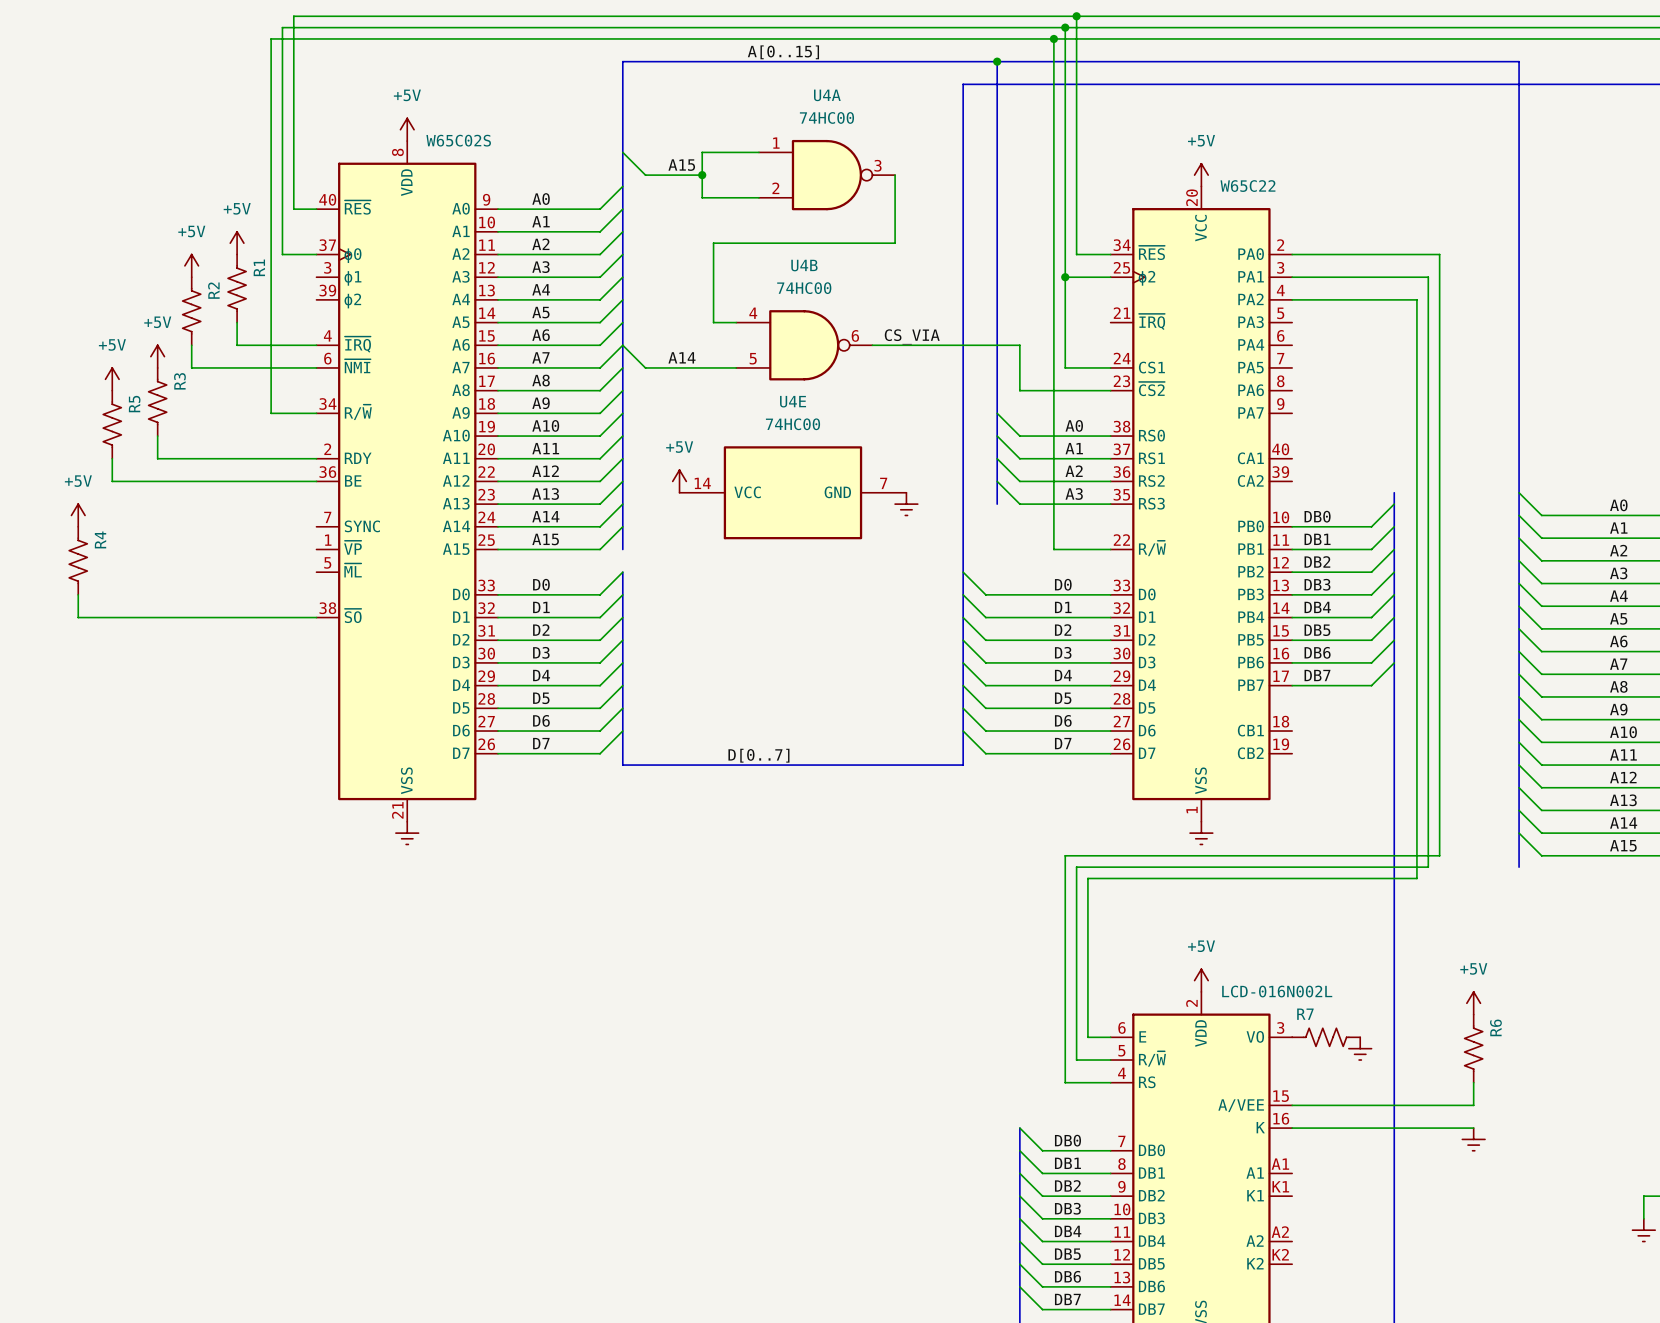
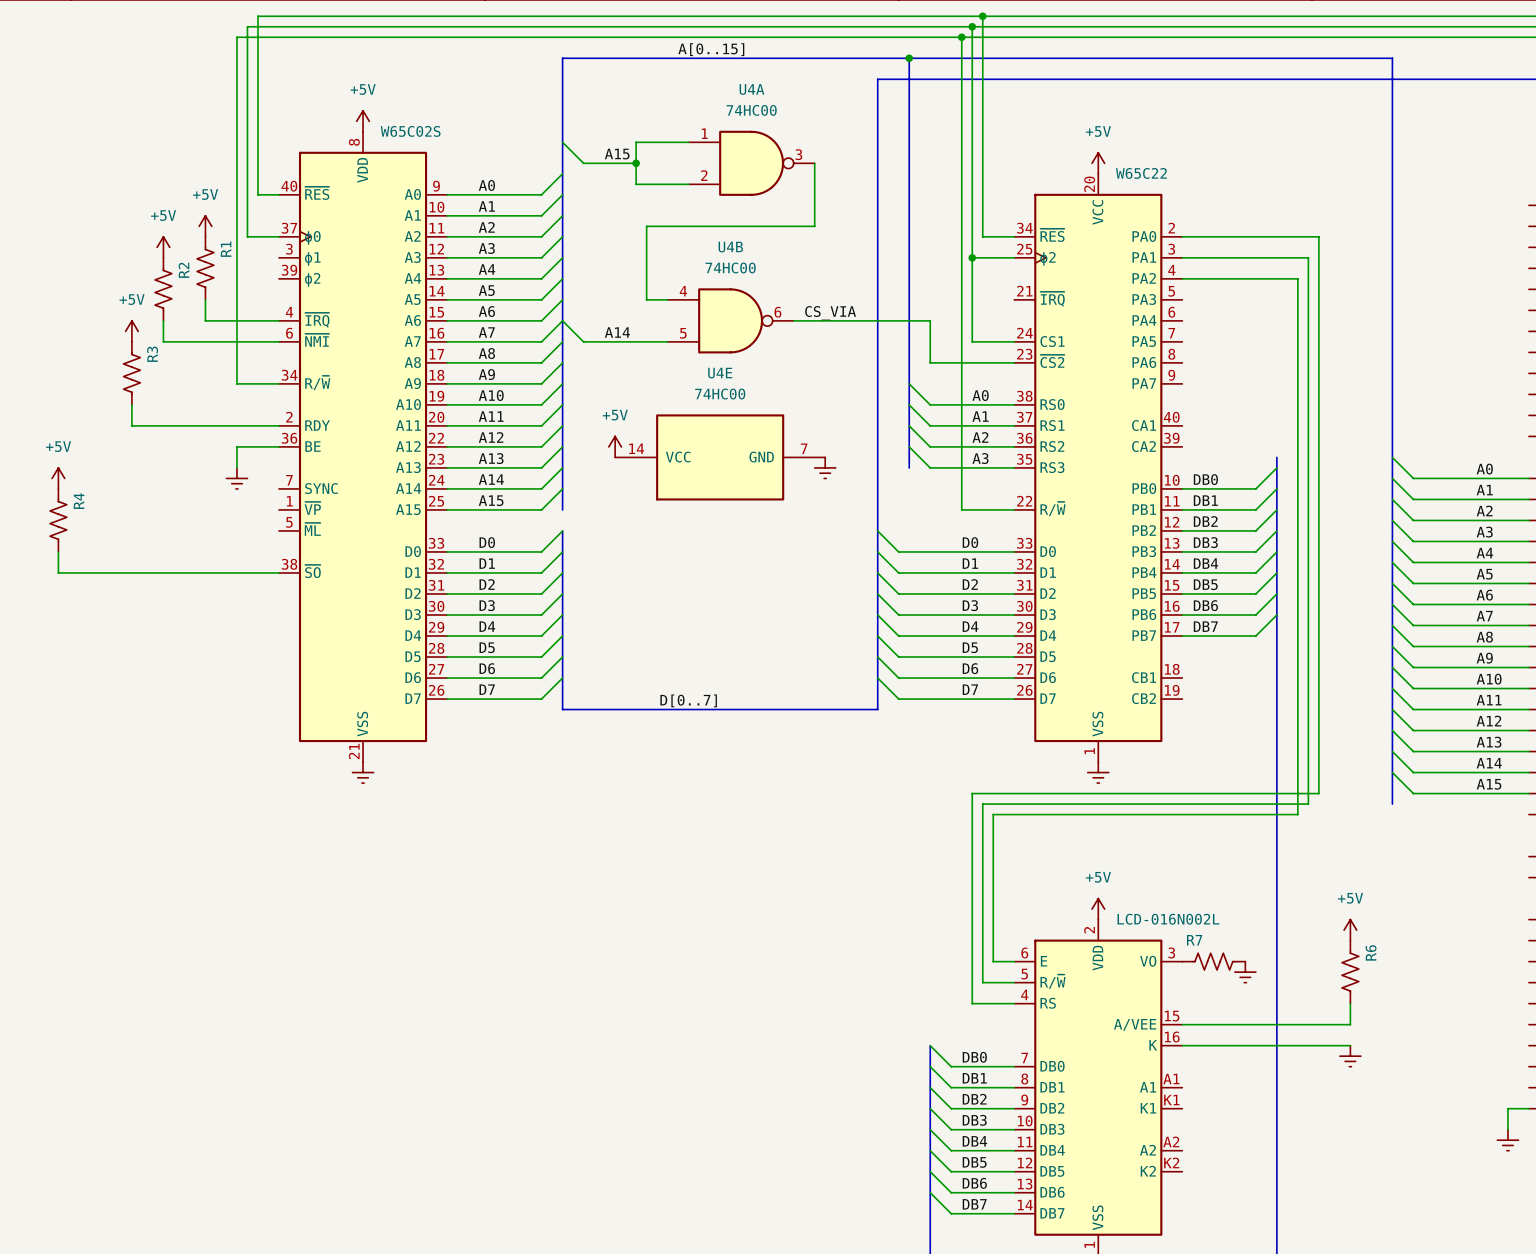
power symbol: +5V (112, 379) -> none
R5: (112, 424) -> none
wire: (112, 458) (112, 481) (271, 481) -> (236, 467) (236, 446)
power symbol: none -> (236, 478)

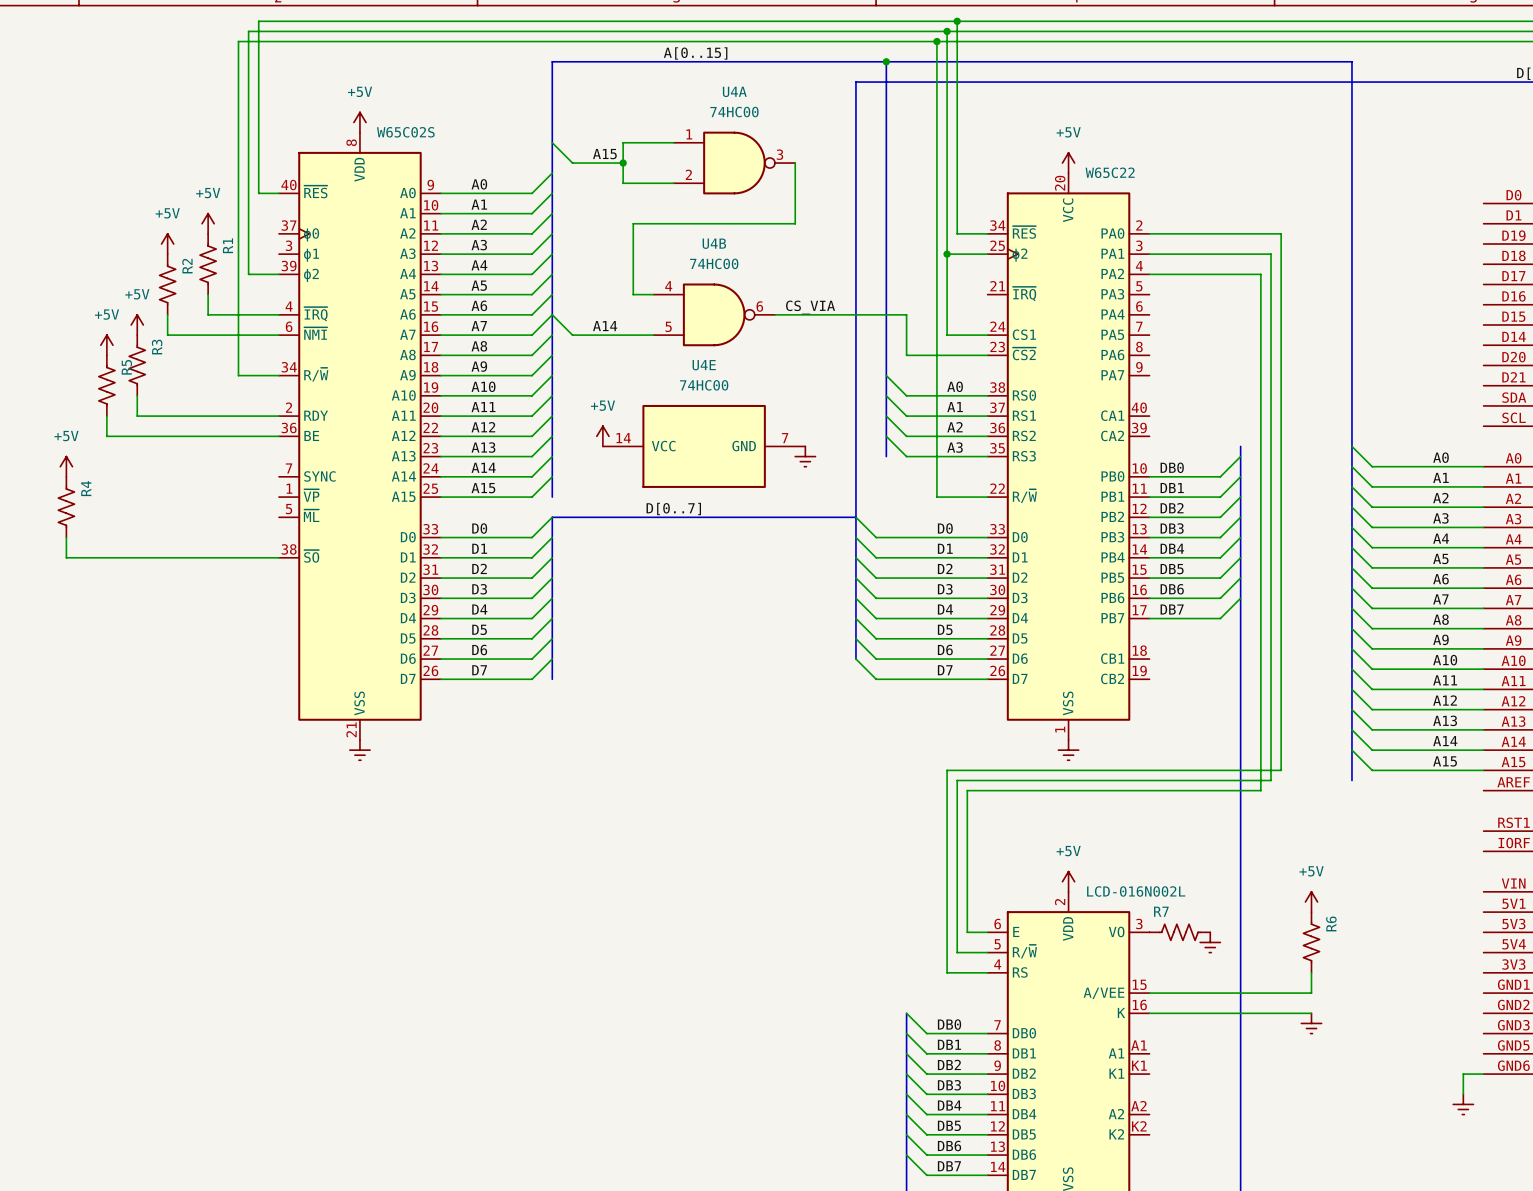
wire: (247, 236) (278, 236) -> (248, 233) (248, 274) (278, 274)
power symbol: none -> +5V (106, 345)
R5: none -> (106, 385)
wire: (236, 446) (236, 467) -> (238, 436) (106, 436) (106, 416)
power symbol: (236, 478) -> none
bus: none -> (552, 517) (855, 517)
bus: (877, 678) (877, 709) (562, 709) (562, 699) -> none
label position: D[0..7] (688, 700) -> D[0..7] (673, 508)

